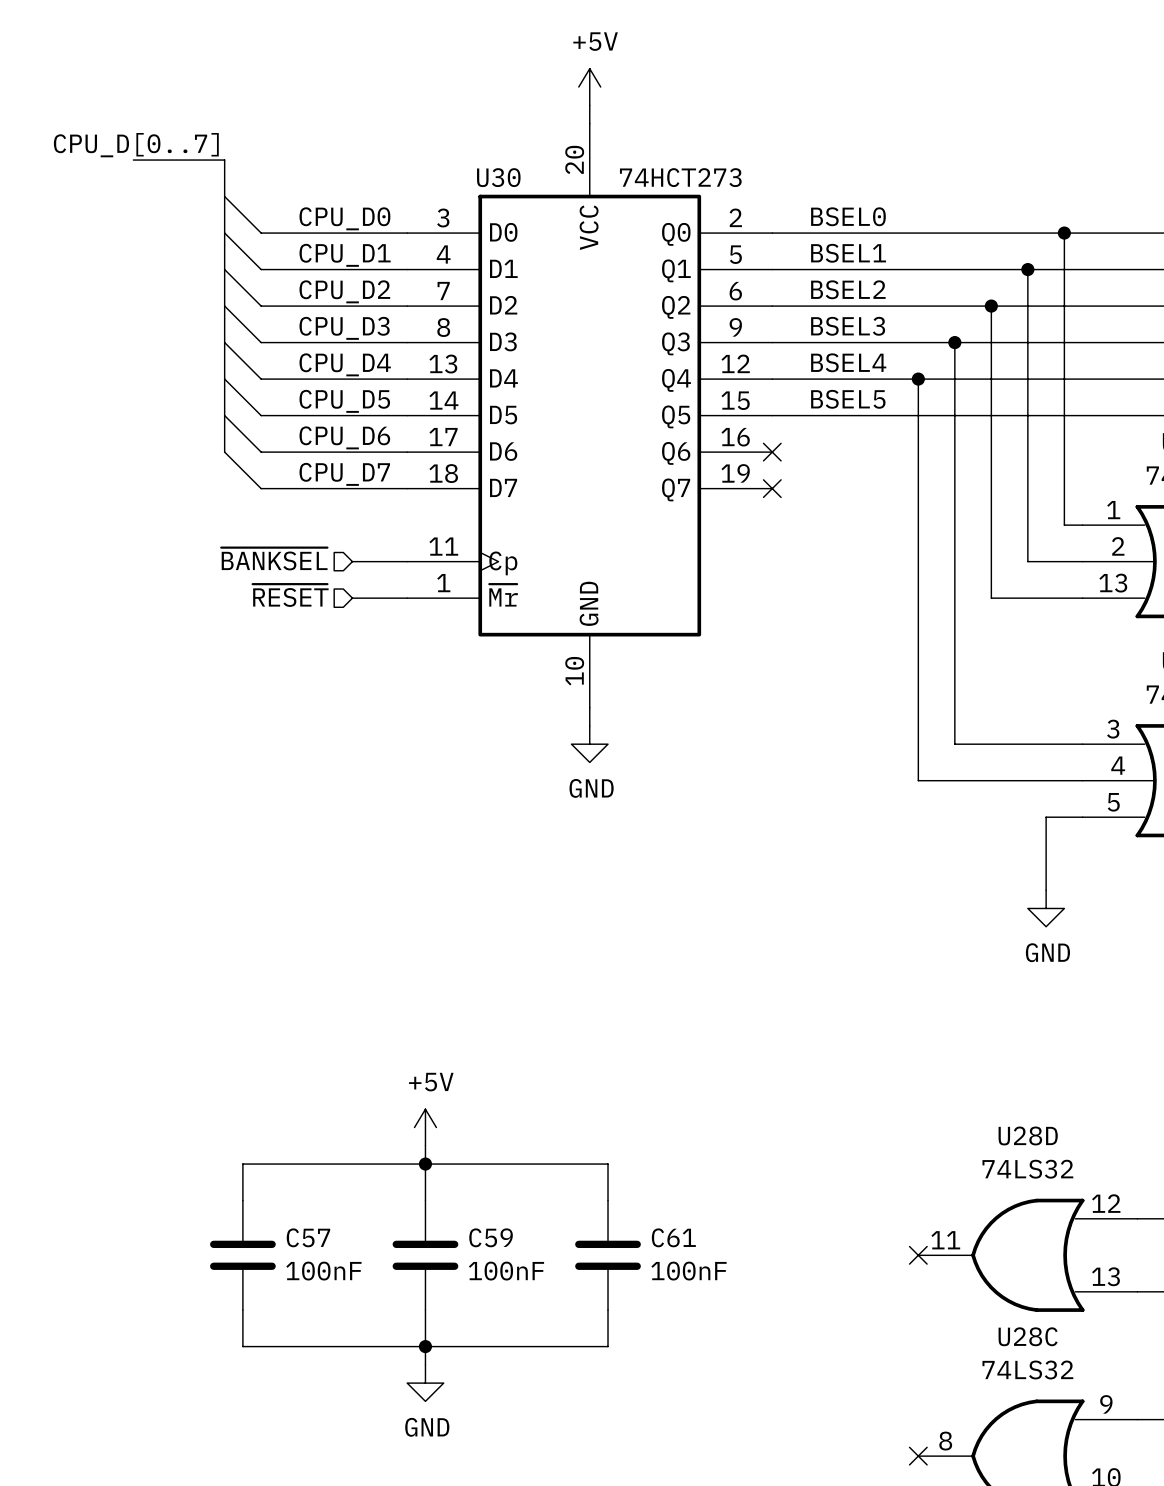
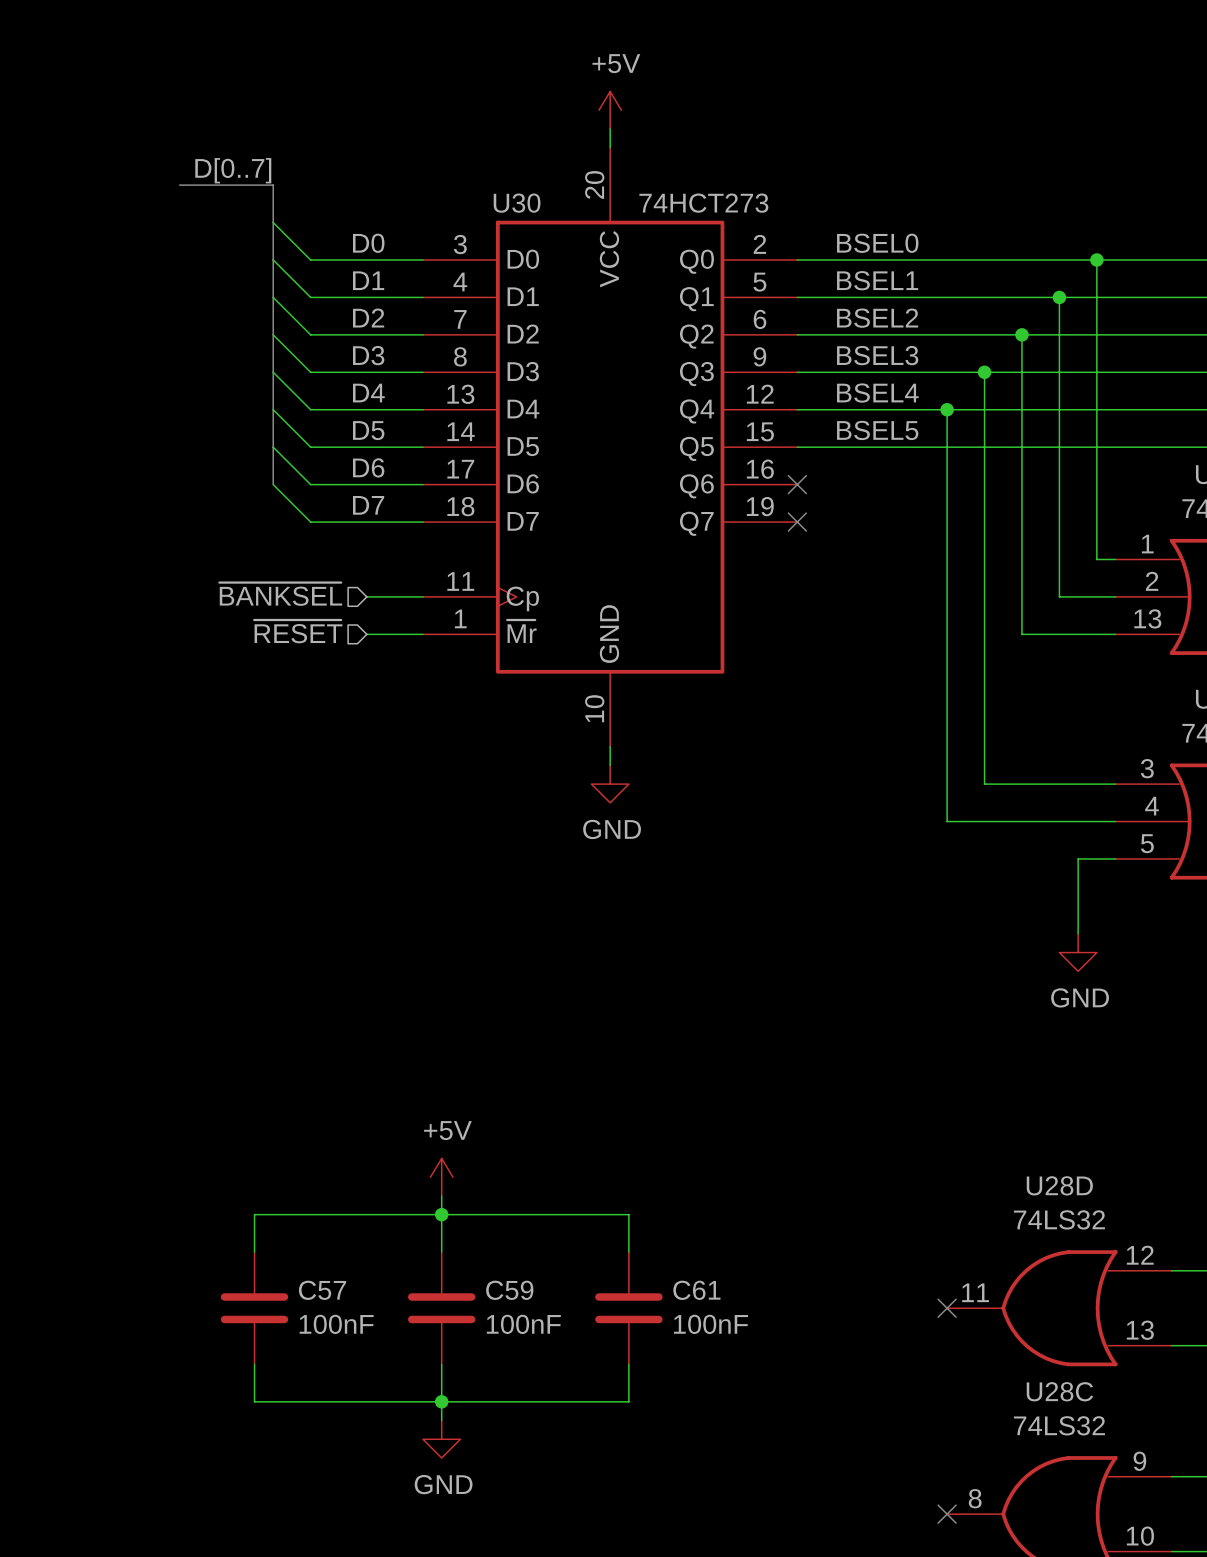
label: CPU_D[0..7] (136, 145) -> D[0..7] (233, 170)
bus: (133, 160) (169, 160) -> none
bus: (224, 160) (224, 452) -> (235, 185) (273, 185) (273, 484)
wire: (224, 196) (261, 233) (297, 233) -> (273, 222) (310, 259)
label: none -> D0 (368, 243)
label: CPU_D0 (344, 218) -> none
wire: (224, 233) (261, 269) (297, 269) -> (273, 259) (310, 297)
label: none -> D1 (368, 280)
label: CPU_D1 (345, 255) -> none
wire: (224, 269) (261, 306) (297, 306) -> (273, 297) (310, 334)
label: none -> D2 (368, 318)
label: CPU_D2 (344, 291) -> none
wire: (224, 306) (261, 342) (297, 342) -> (273, 334) (310, 372)
label: none -> D3 (368, 355)
label: CPU_D3 (344, 328) -> none
wire: (224, 342) (261, 379) (297, 379) -> (273, 372) (310, 409)
label: none -> D4 (368, 393)
label: CPU_D4 (345, 364) -> none
wire: (224, 379) (261, 415) (297, 415) -> (273, 409) (310, 447)
label: none -> D5 (368, 430)
label: CPU_D5 (344, 401) -> none
wire: (224, 415) (261, 452) (297, 452) -> (273, 447) (310, 484)
label: none -> D6 (368, 467)
label: CPU_D6 (344, 437) -> none
wire: (224, 452) (261, 488) (297, 488) -> (273, 484) (310, 522)
label: none -> D7 (368, 505)
label: CPU_D7 (344, 474) -> none

